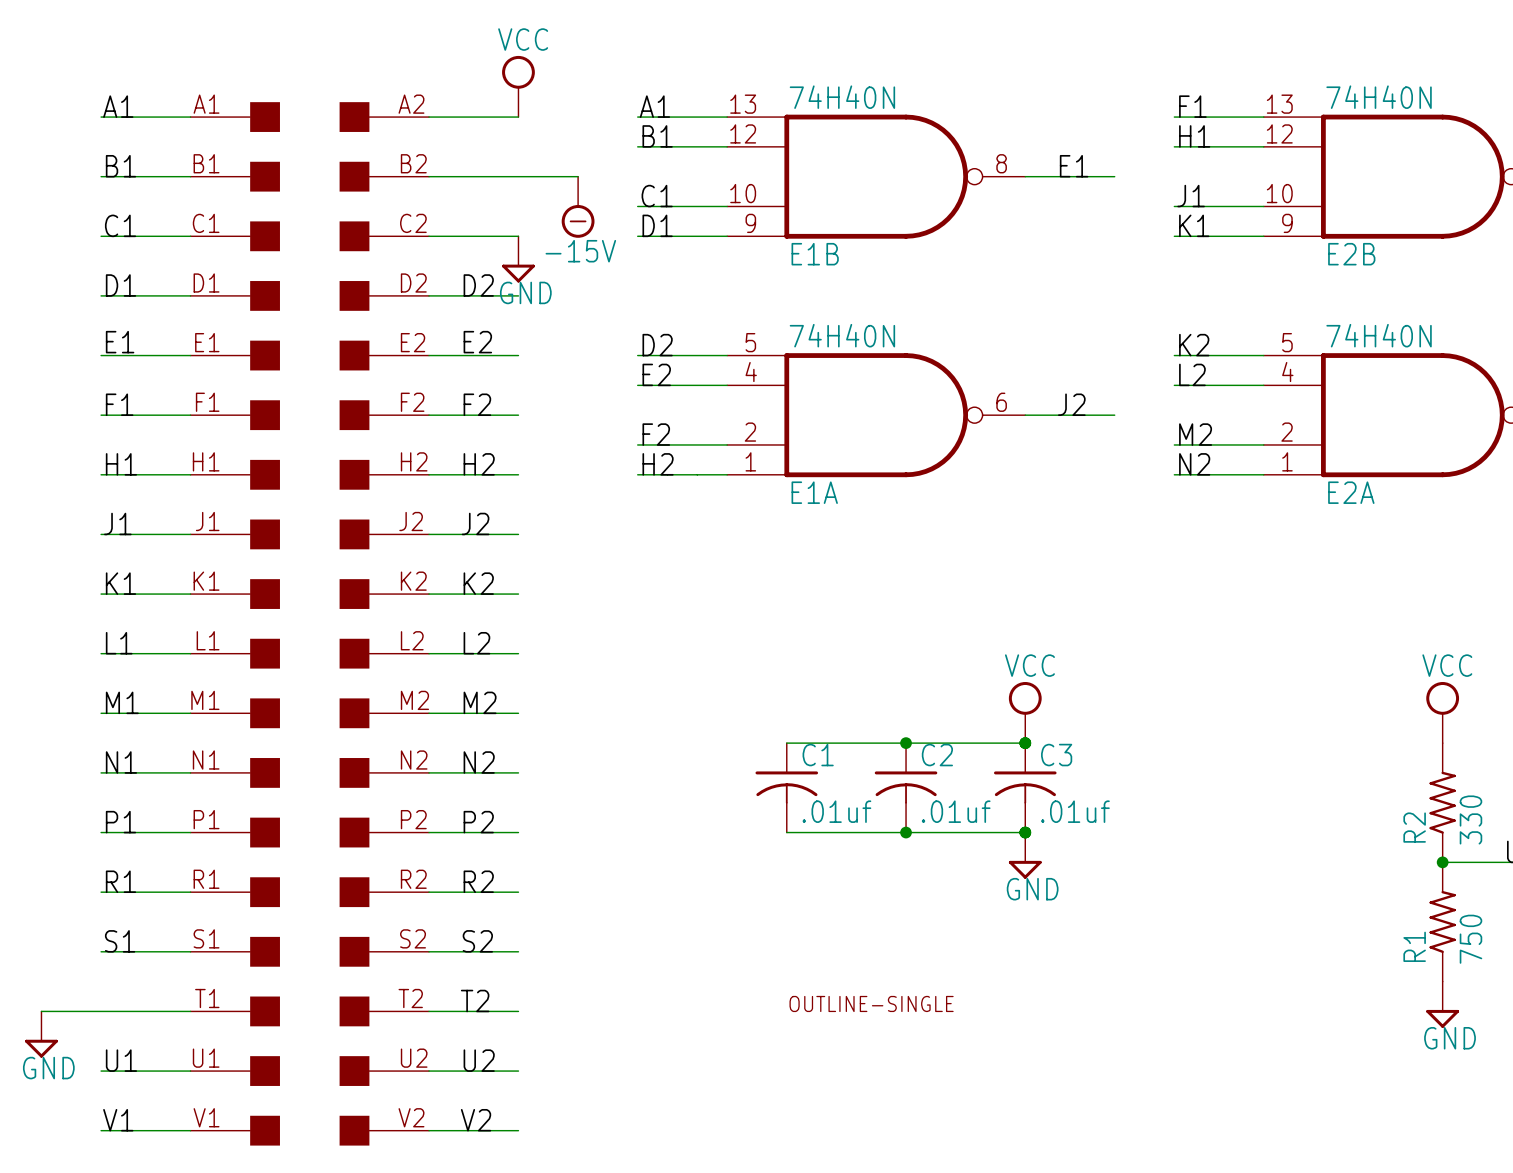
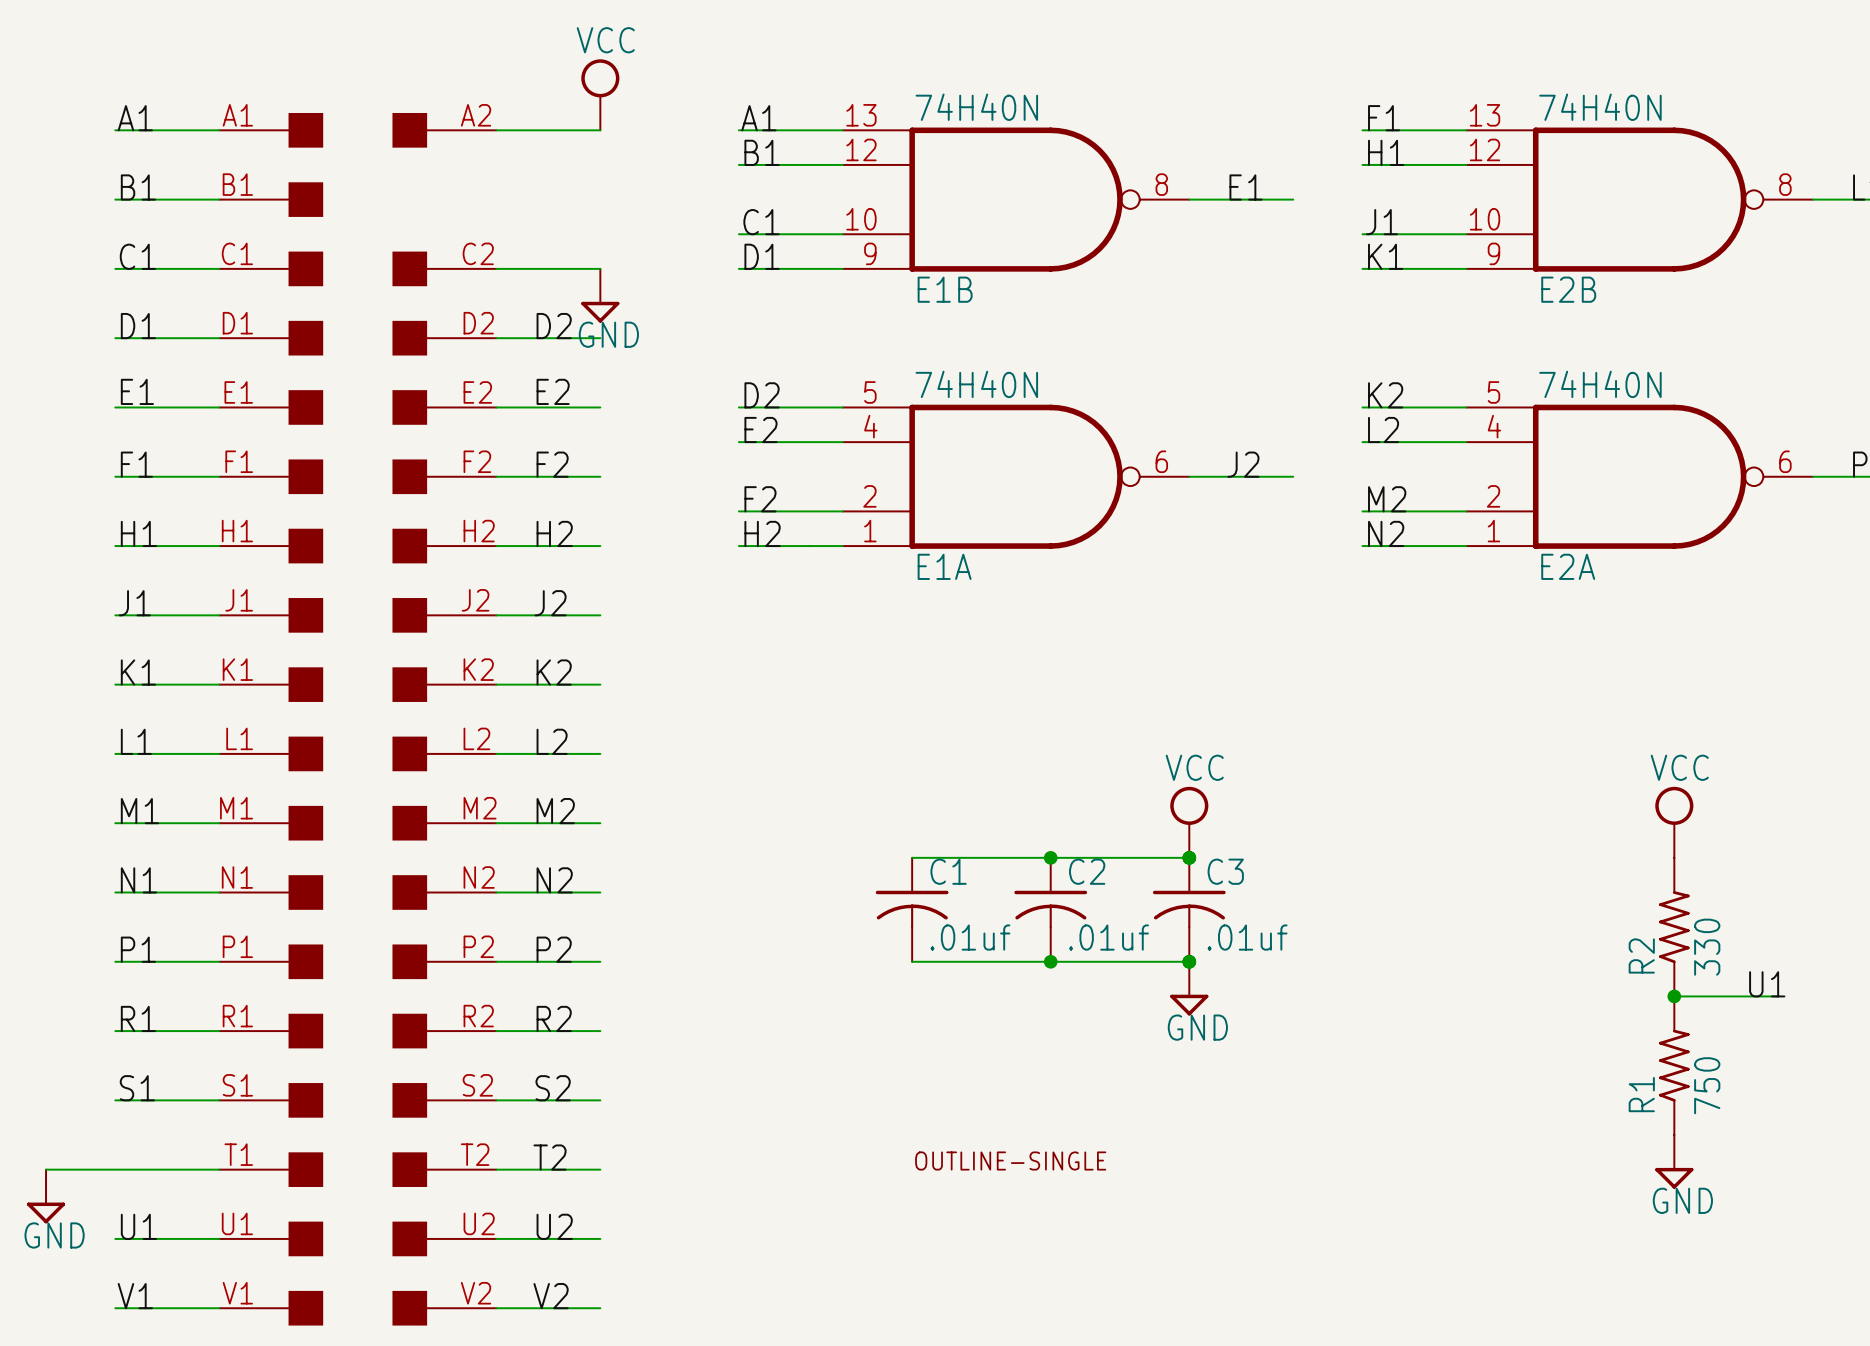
part: (384, 176) -> none
wire: (429, 176) (578, 176) -> none
power symbol: -15V (578, 207) -> none

